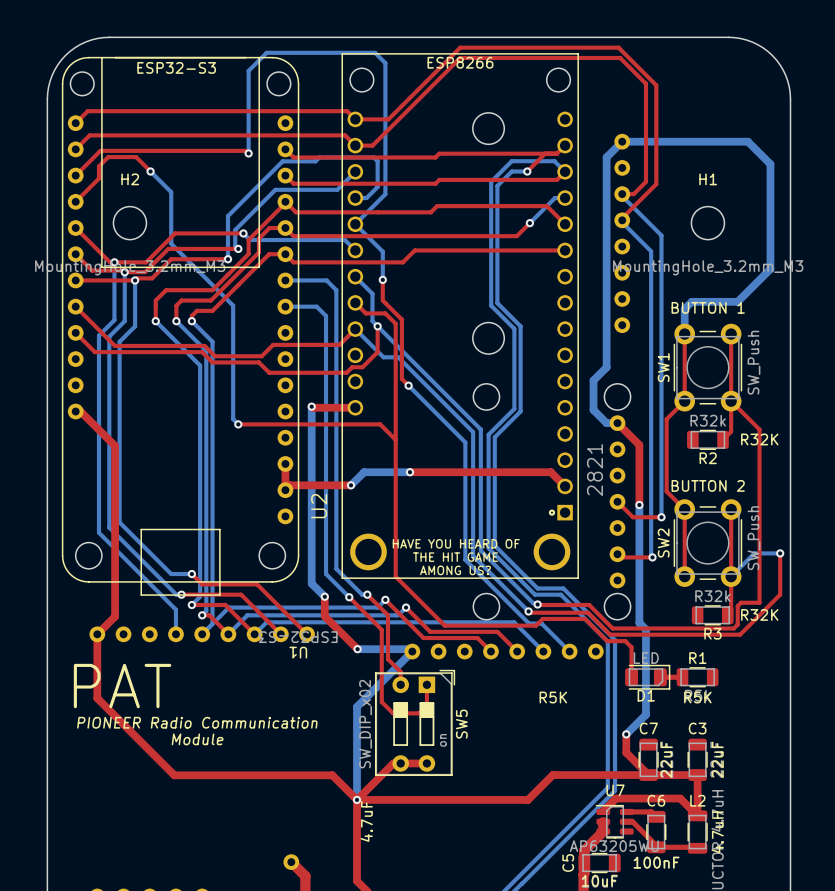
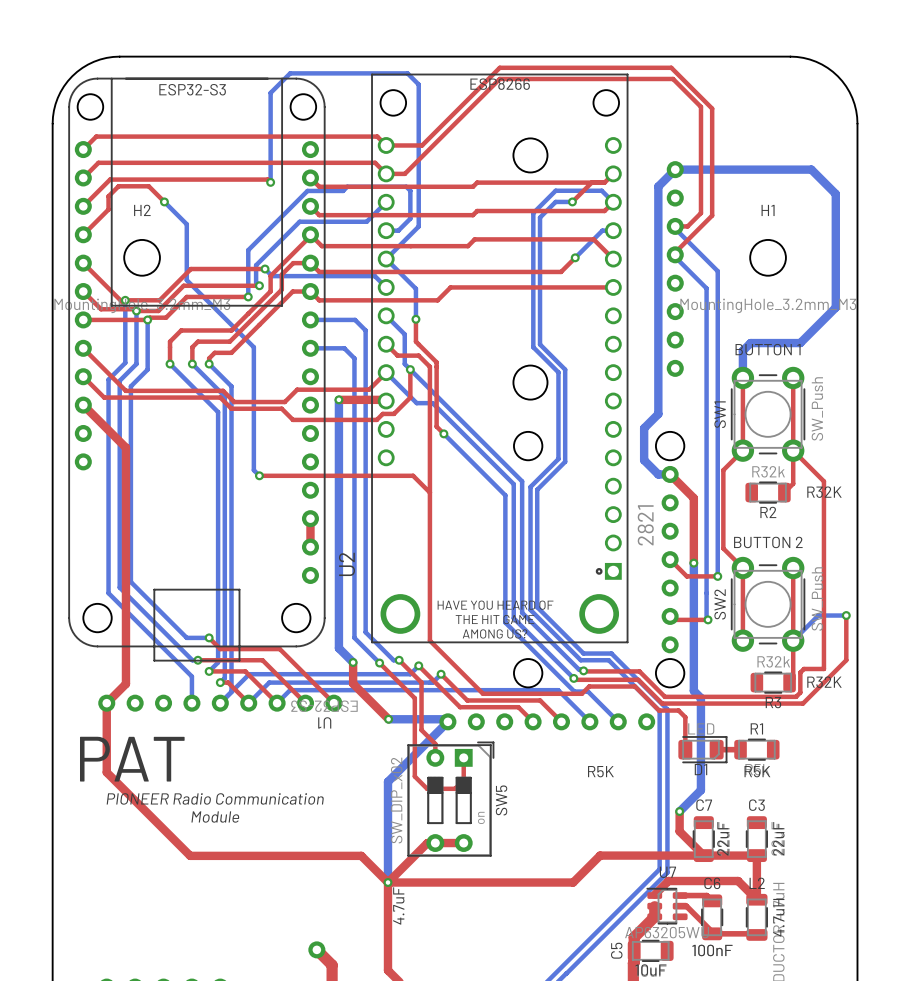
top track: none -> (338, 399) (386, 401)
bottom track: none -> (338, 399) (338, 456)
top track: (311, 406) (355, 407) -> none
via position: (311, 406) -> (338, 399)
top track: (75, 411) (80, 411) (115, 446) -> (83, 405) (125, 447) (125, 499)
top track: (410, 472) (550, 472) (565, 486) -> none
bottom track: (410, 472) (364, 472) (351, 485) -> none
via: (410, 472) -> none
top track: (351, 485) (290, 485) (285, 490) -> none
via: (351, 485) -> none

